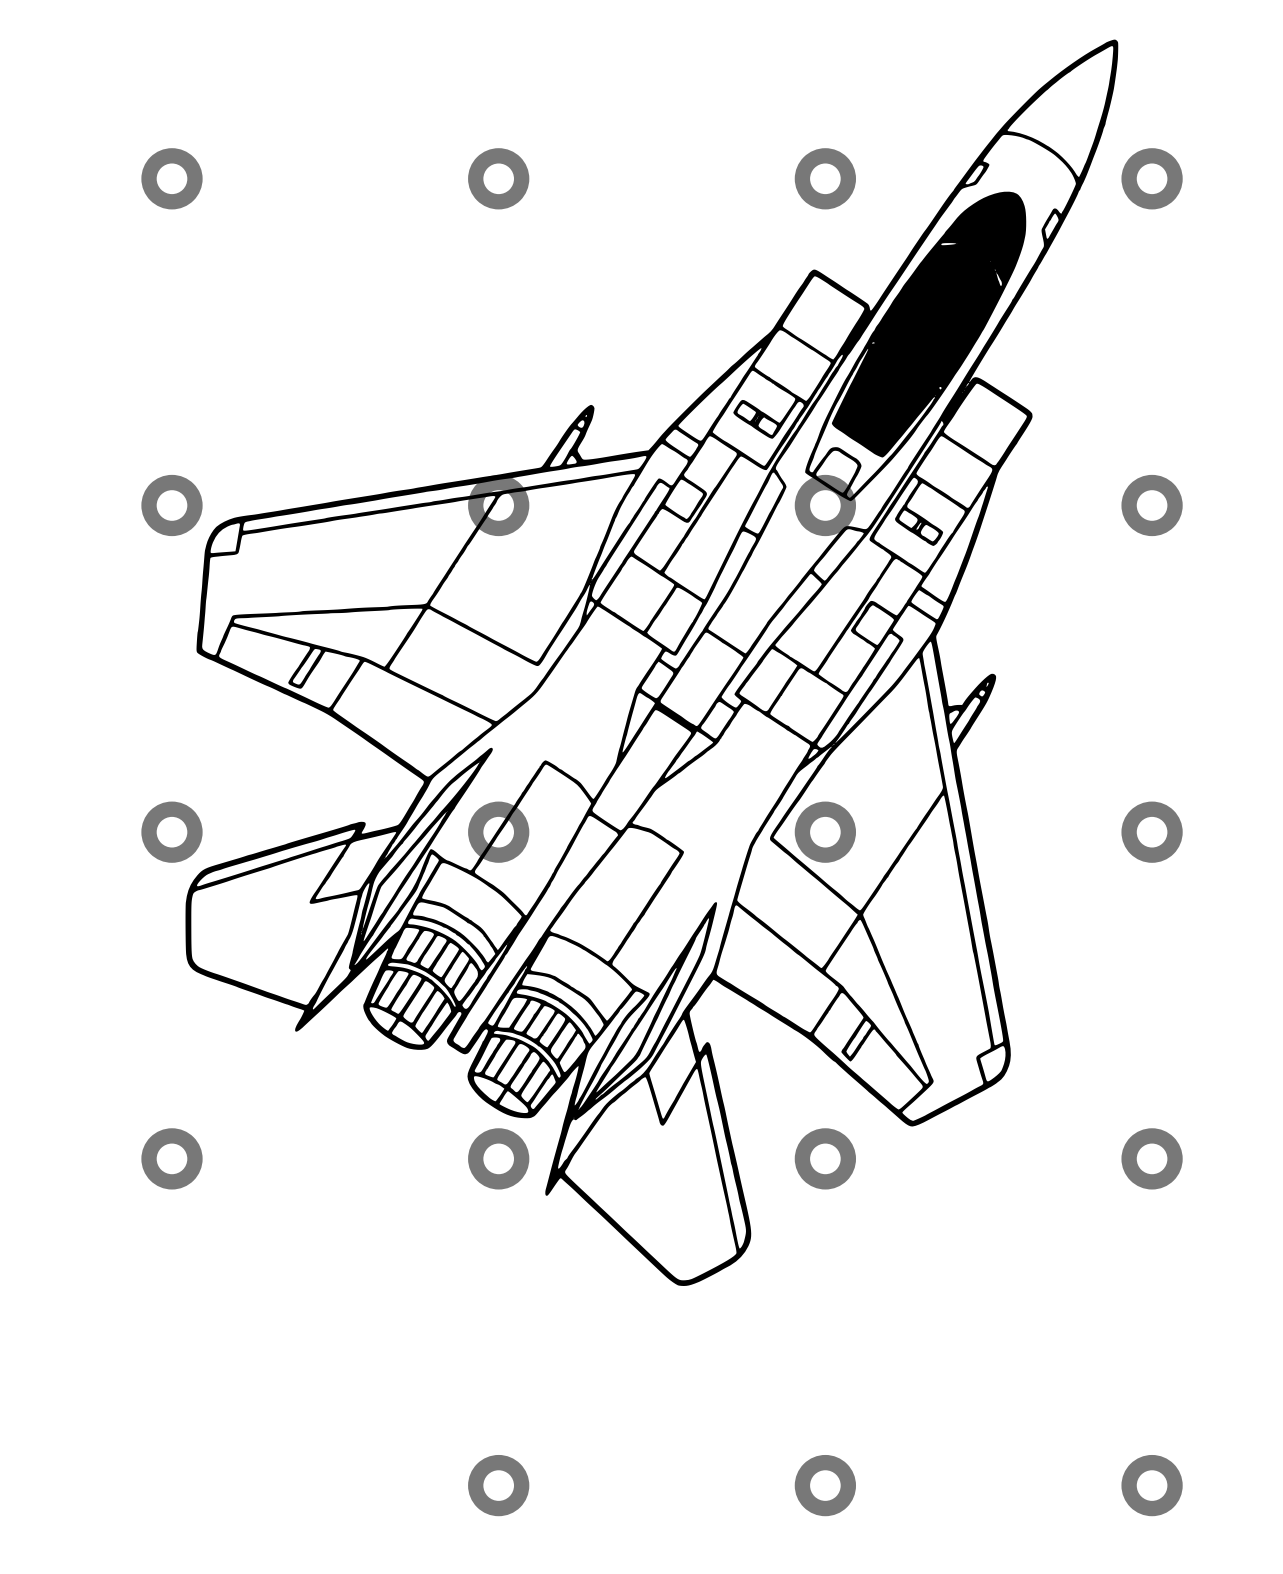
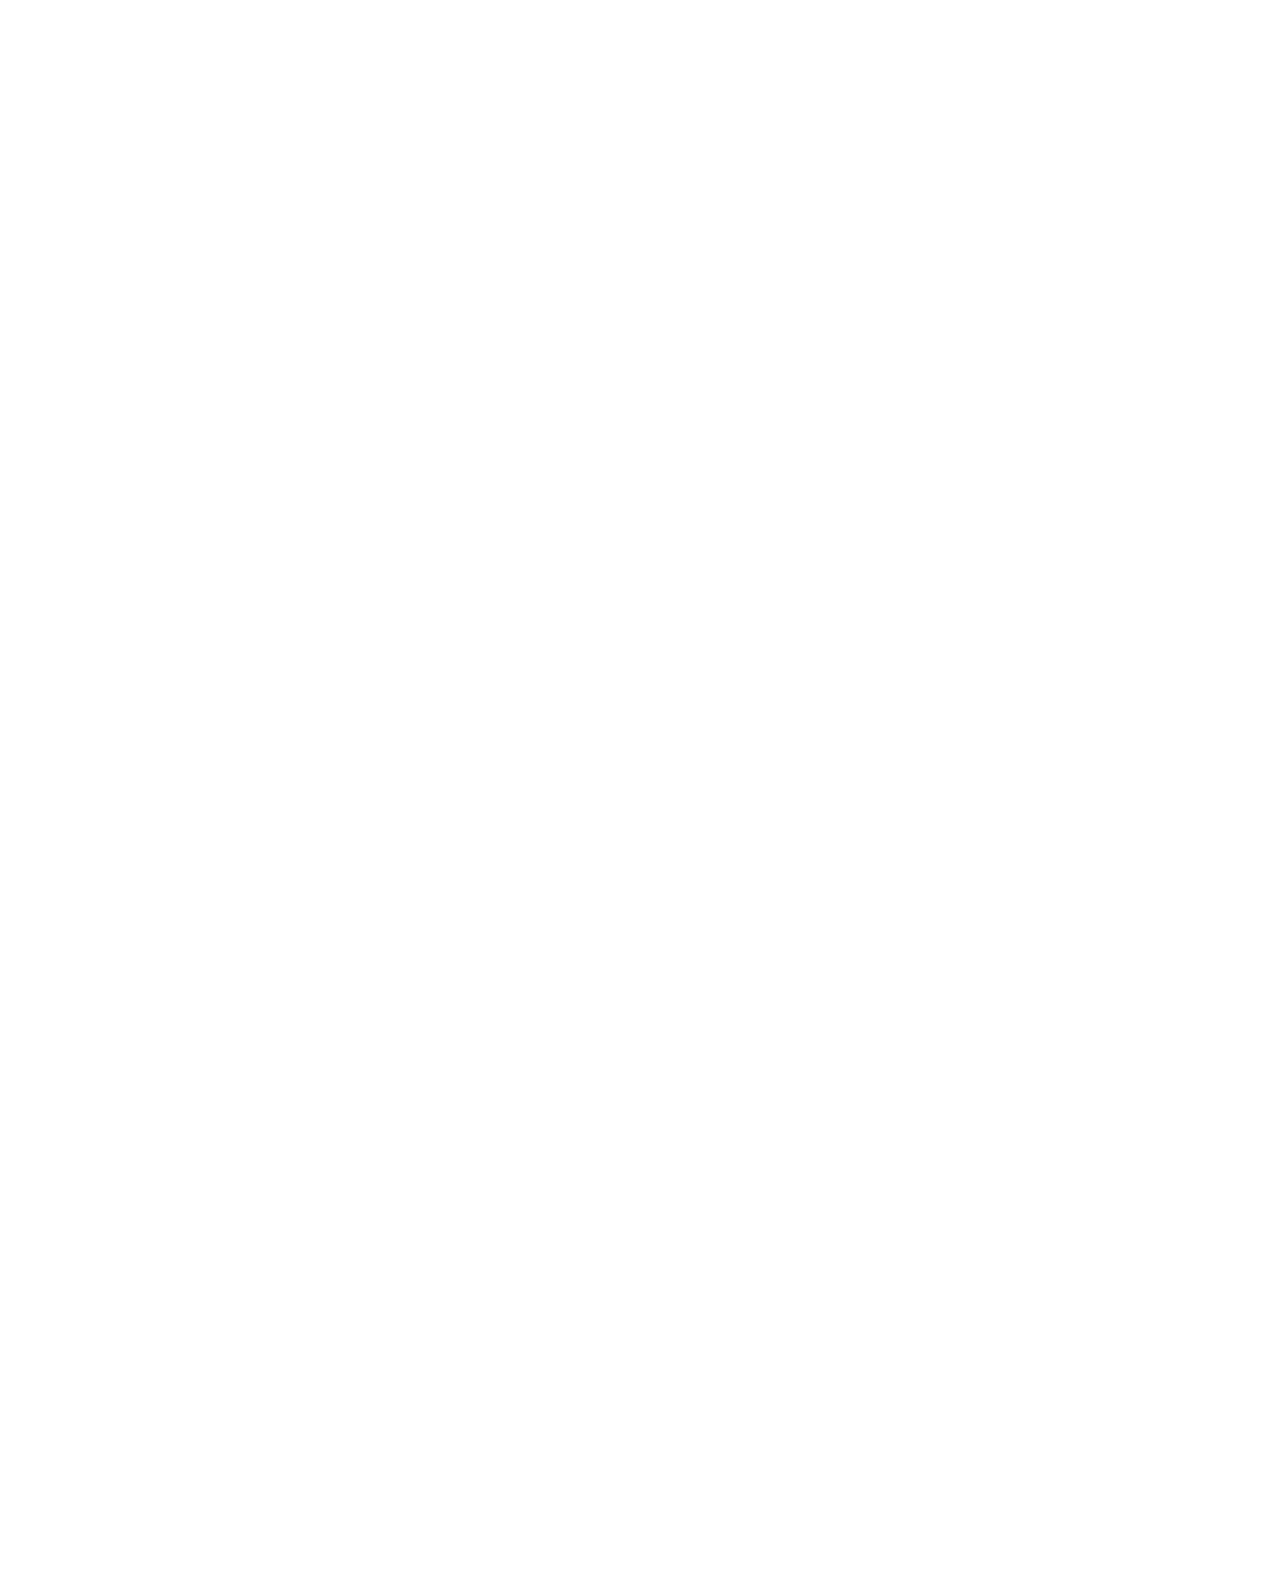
drawing: [185, 39, 1119, 1287] -> none
via: (172, 178) -> none
via: (498, 178) -> none
via: (825, 178) -> none
via: (1152, 178) -> none
via: (172, 505) -> none
via: (498, 505) -> none
via: (825, 505) -> none
via: (1152, 505) -> none
via: (172, 832) -> none
via: (498, 832) -> none
via: (825, 832) -> none
via: (1152, 832) -> none
via: (172, 1158) -> none
via: (498, 1158) -> none
via: (825, 1158) -> none
via: (1152, 1158) -> none
via: (498, 1485) -> none
via: (825, 1485) -> none
via: (1152, 1485) -> none

